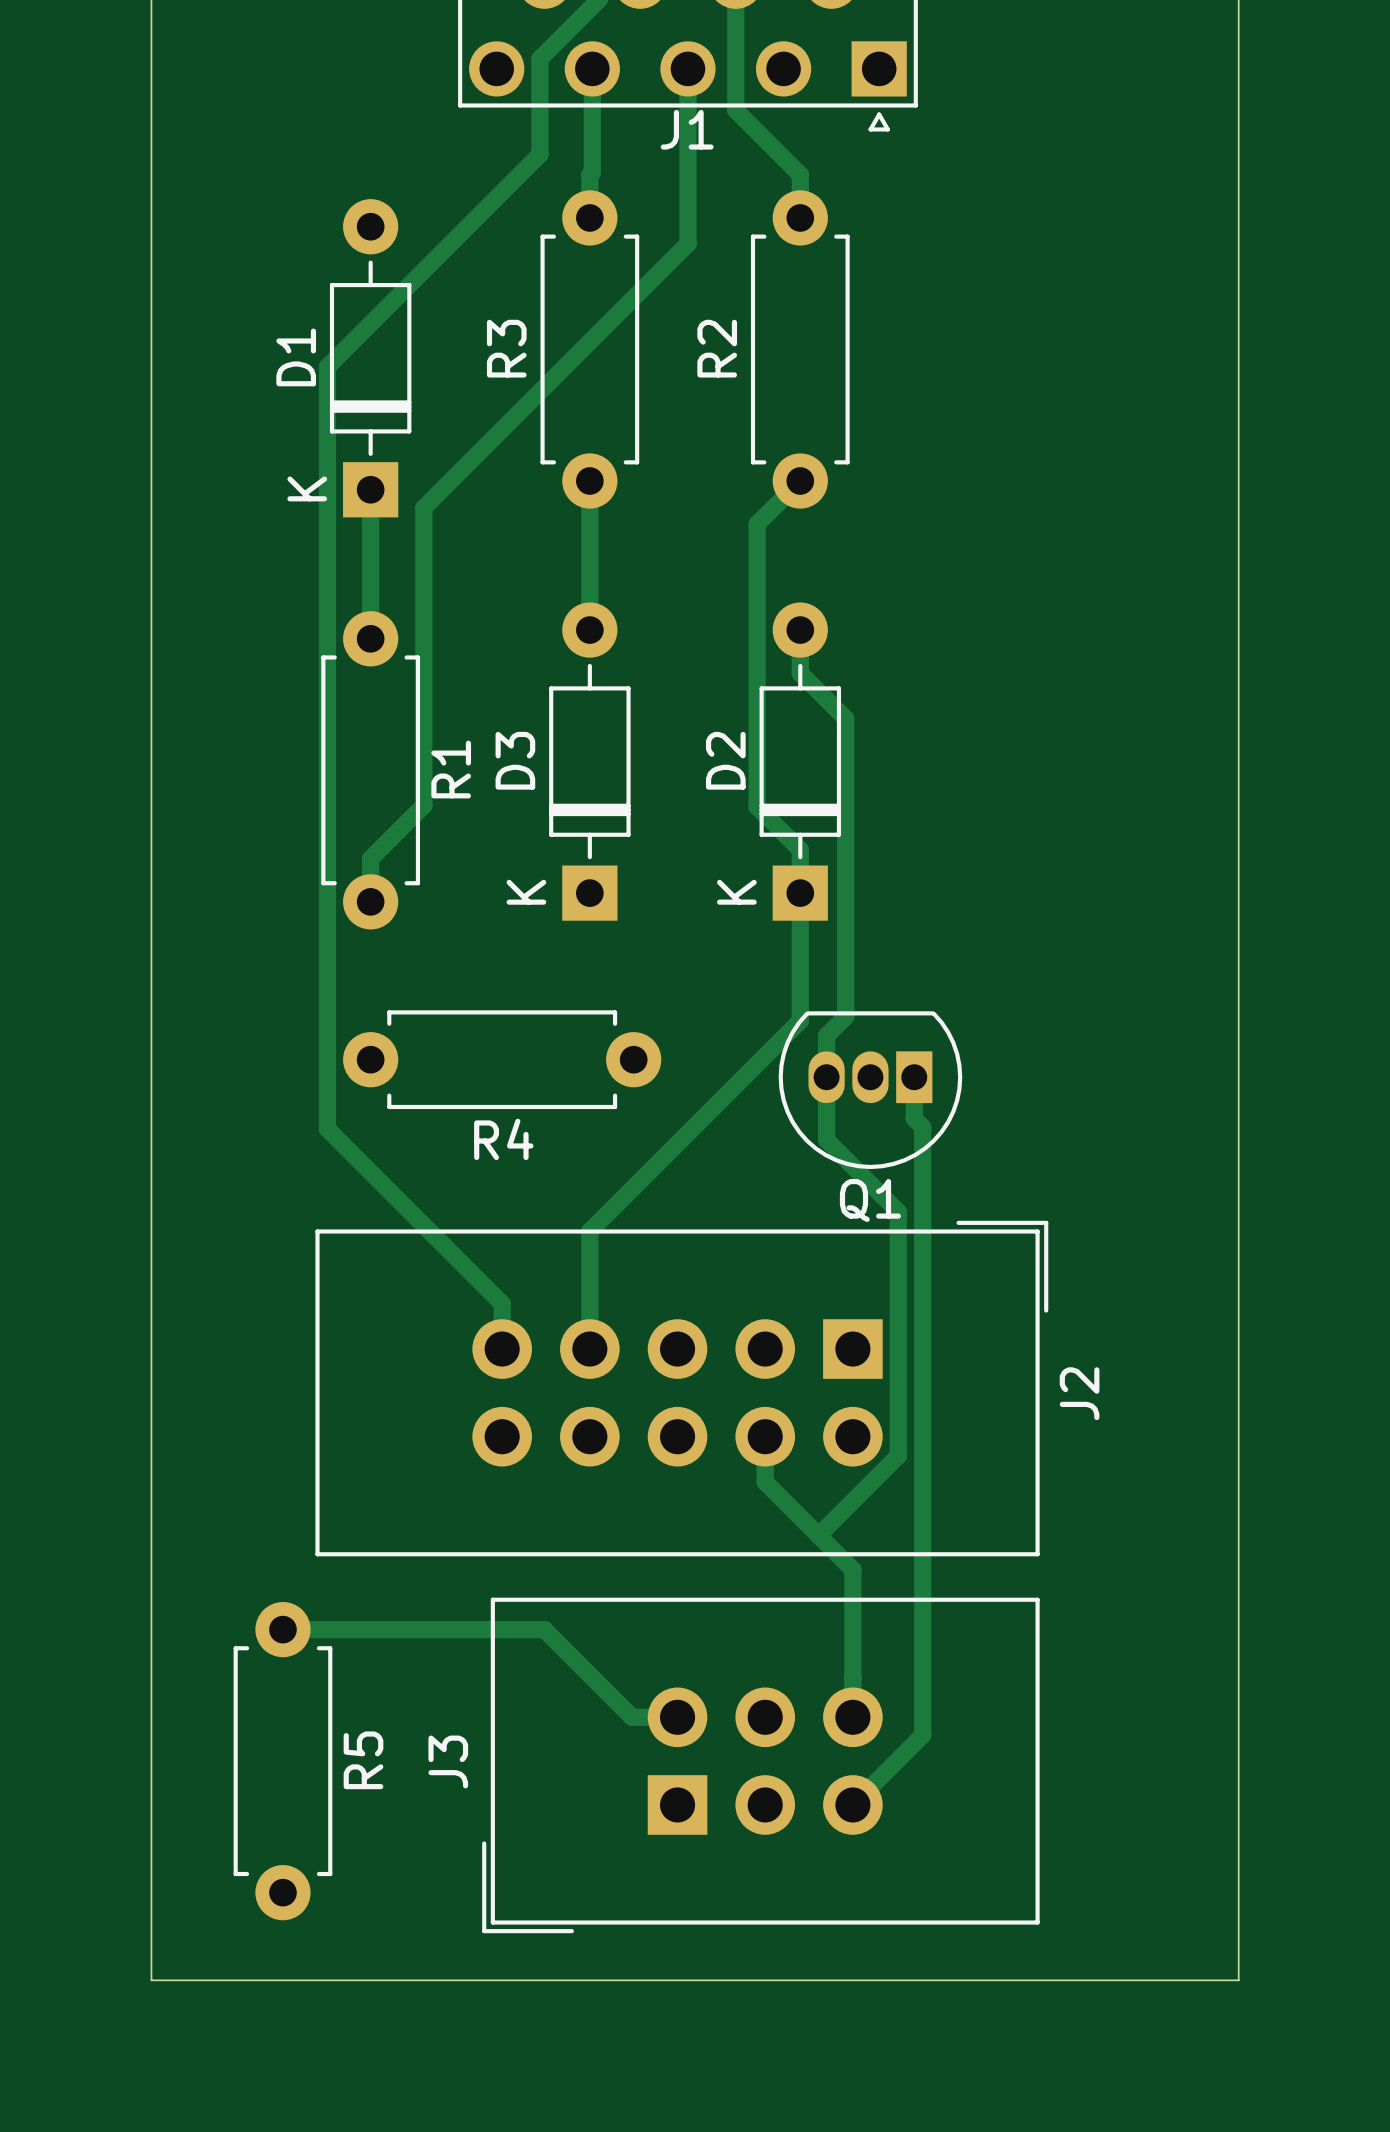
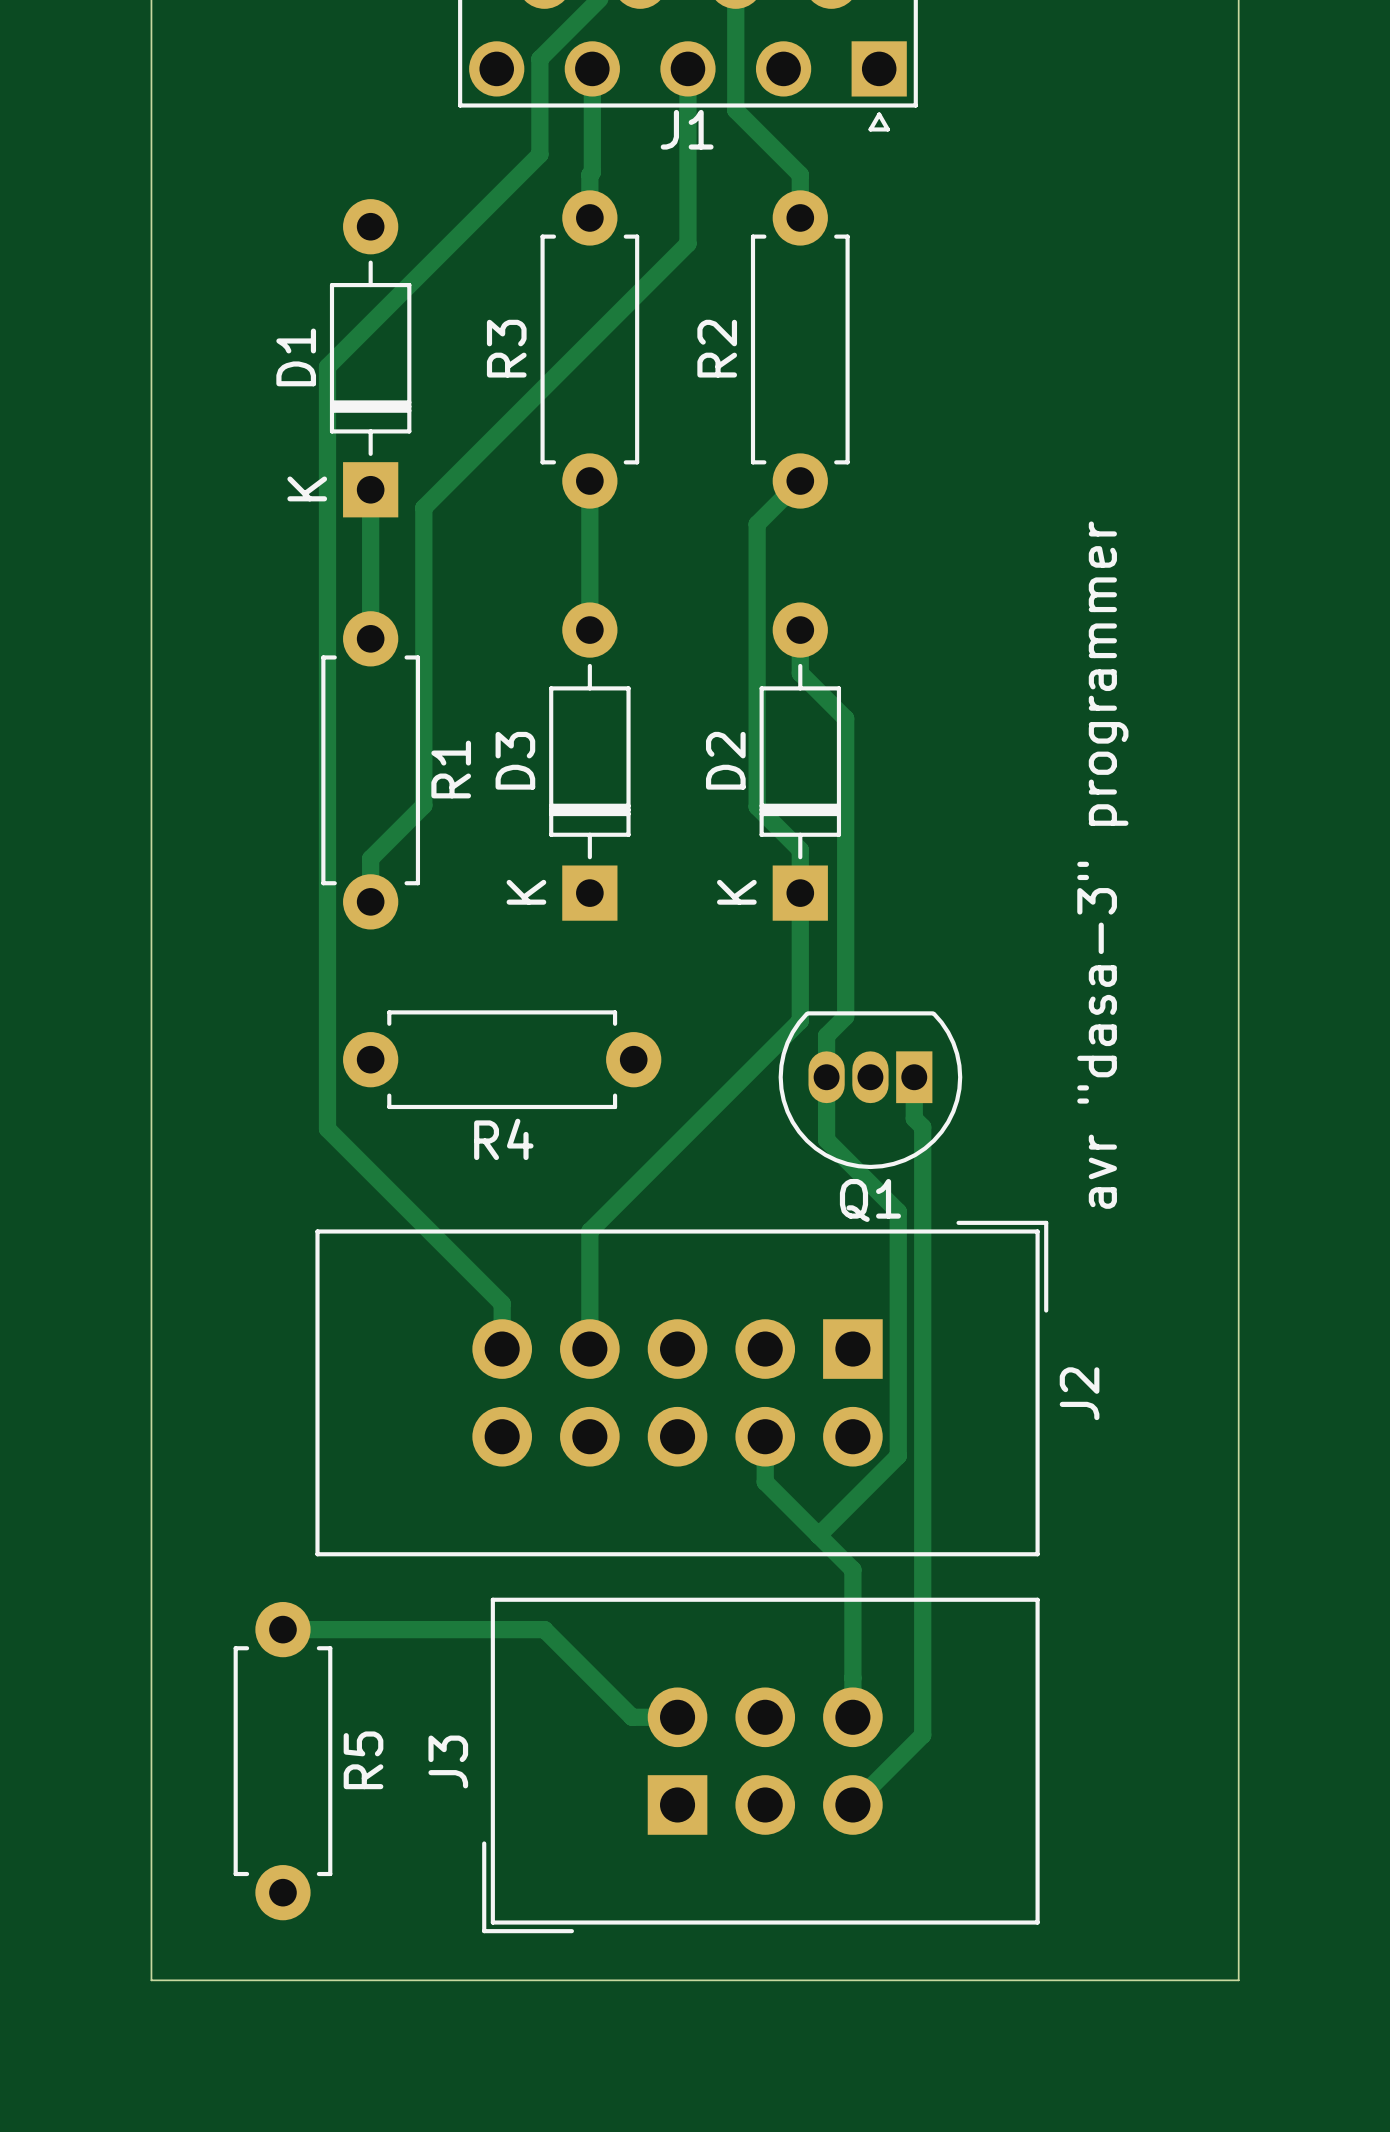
text: none -> avr "dasa-3" programmer (1102, 865)

